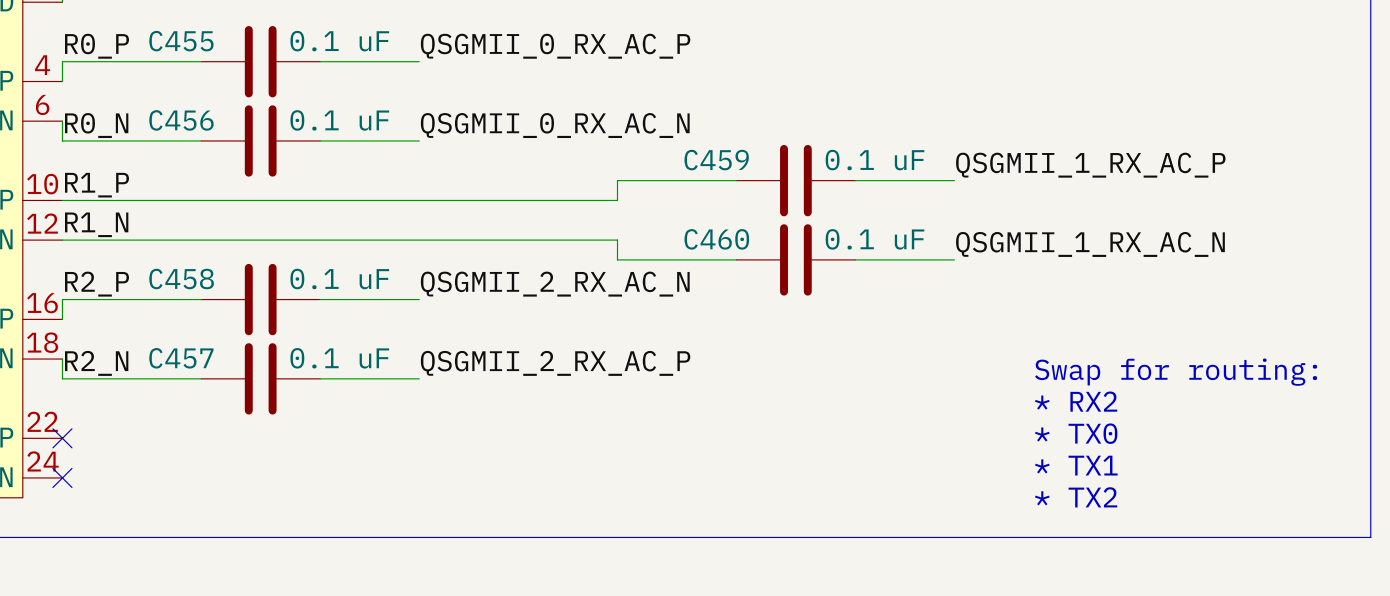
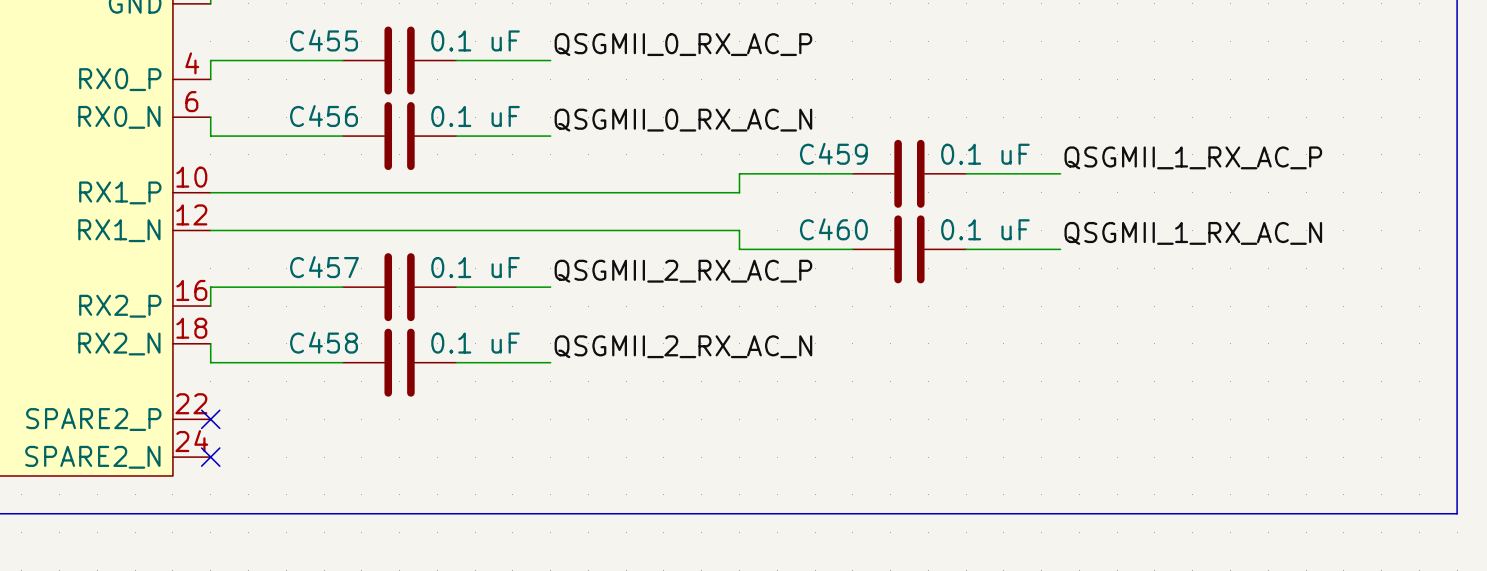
label: R0_P (97, 46) -> none
label: R0_N (96, 125) -> none
label: R1_P (97, 185) -> none
label: R1_N (96, 224) -> none
C458 name: C458 (181, 279) -> C457 (324, 267)
label: R2_P (97, 284) -> none
label: QSGMII_2_RX_AC_N (555, 284) -> QSGMII_2_RX_AC_P (683, 271)
C457 name: C457 (181, 358) -> C458 (324, 342)
label: R2_N (96, 363) -> none
label: QSGMII_2_RX_AC_P (555, 363) -> QSGMII_2_RX_AC_N (683, 346)
text: Swap for routing: (1176, 372) -> none
text: * RX2 (1076, 401) -> none
text: * TX0 (1076, 433) -> none
text: * TX1 (1076, 465) -> none
text: * TX2 (1076, 497) -> none

